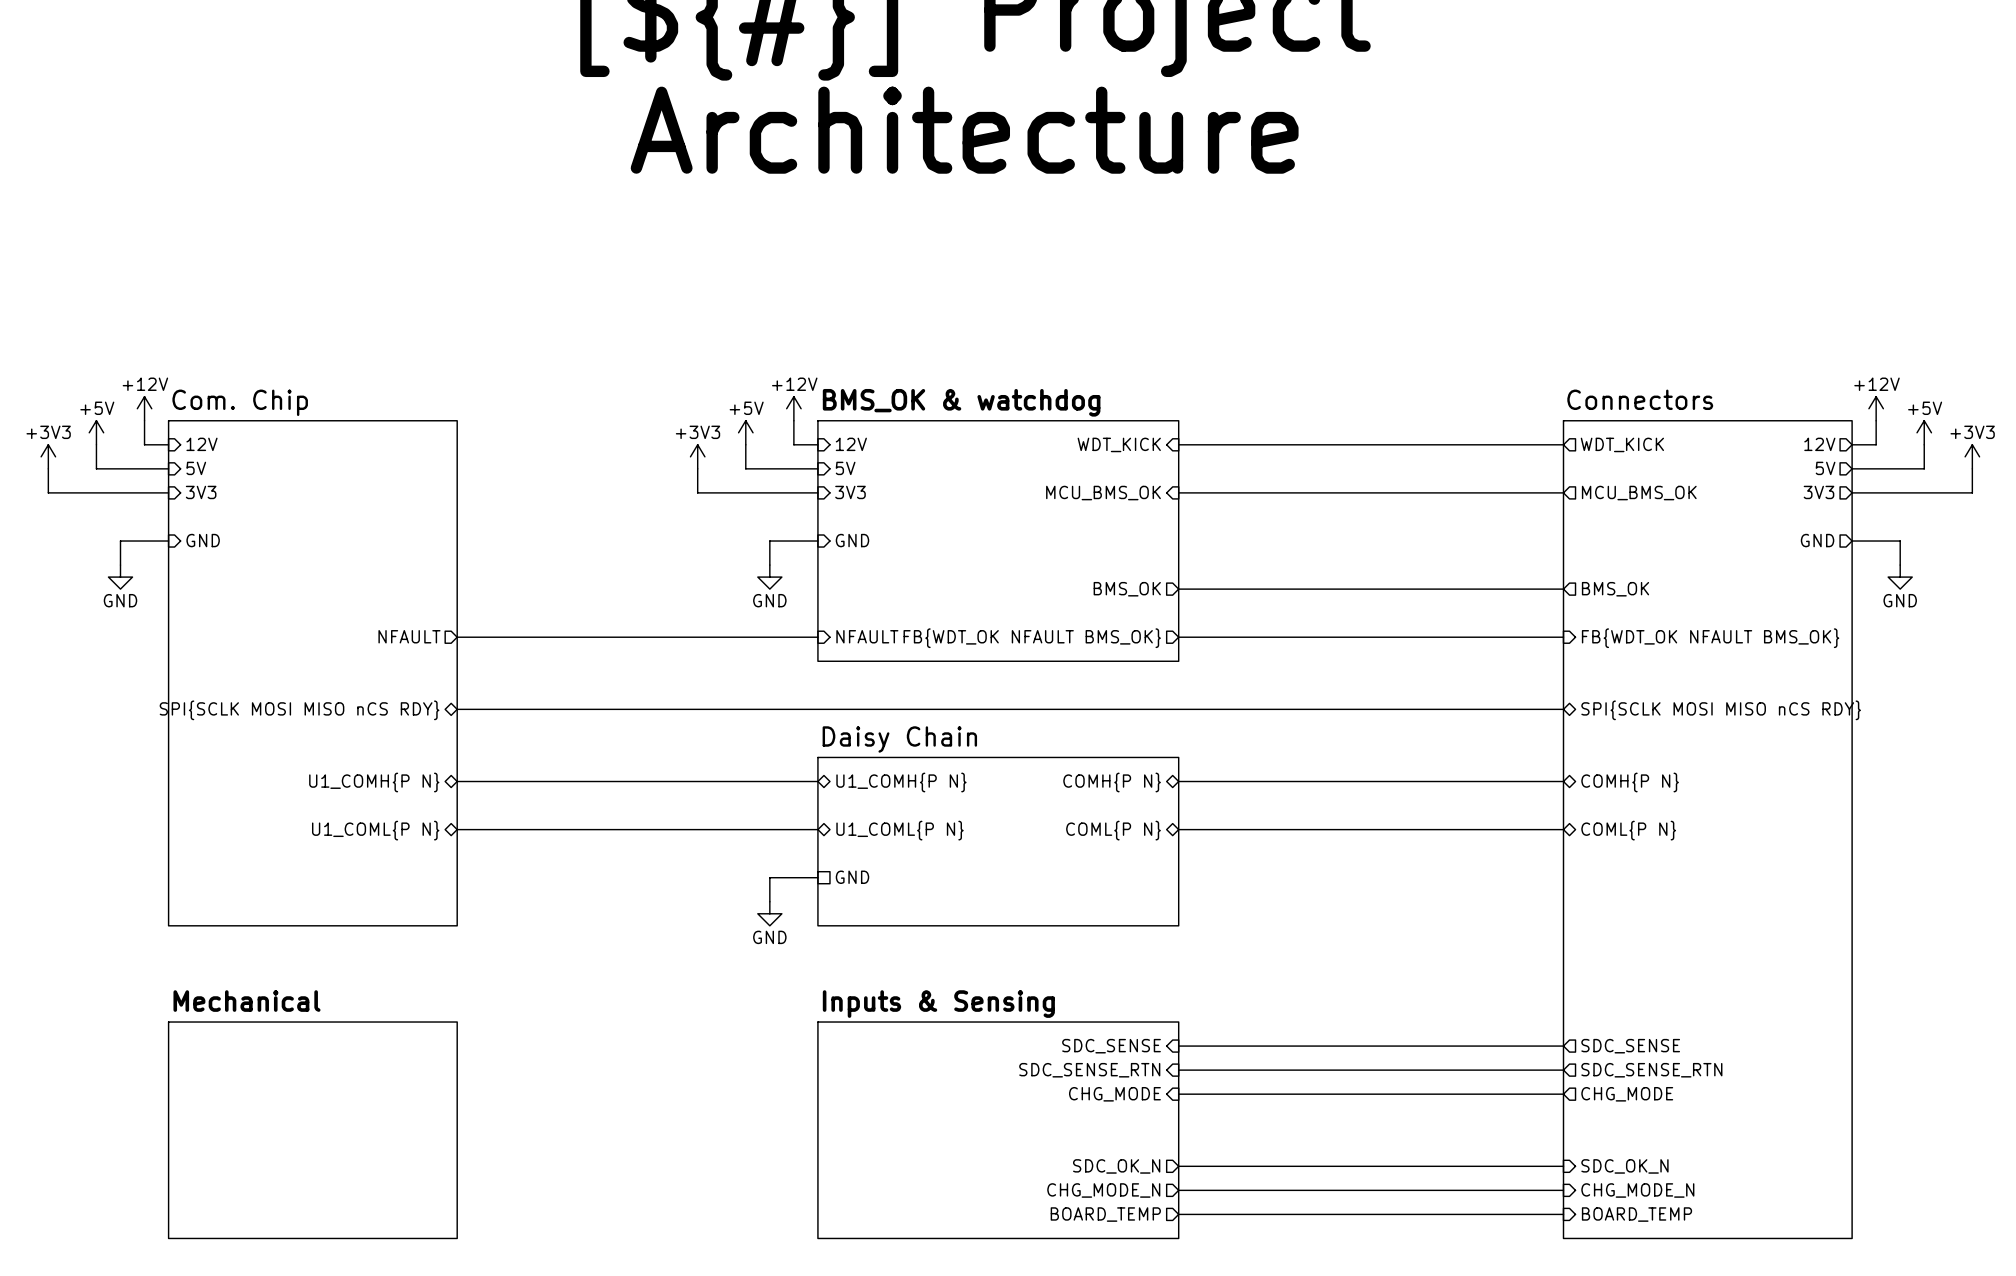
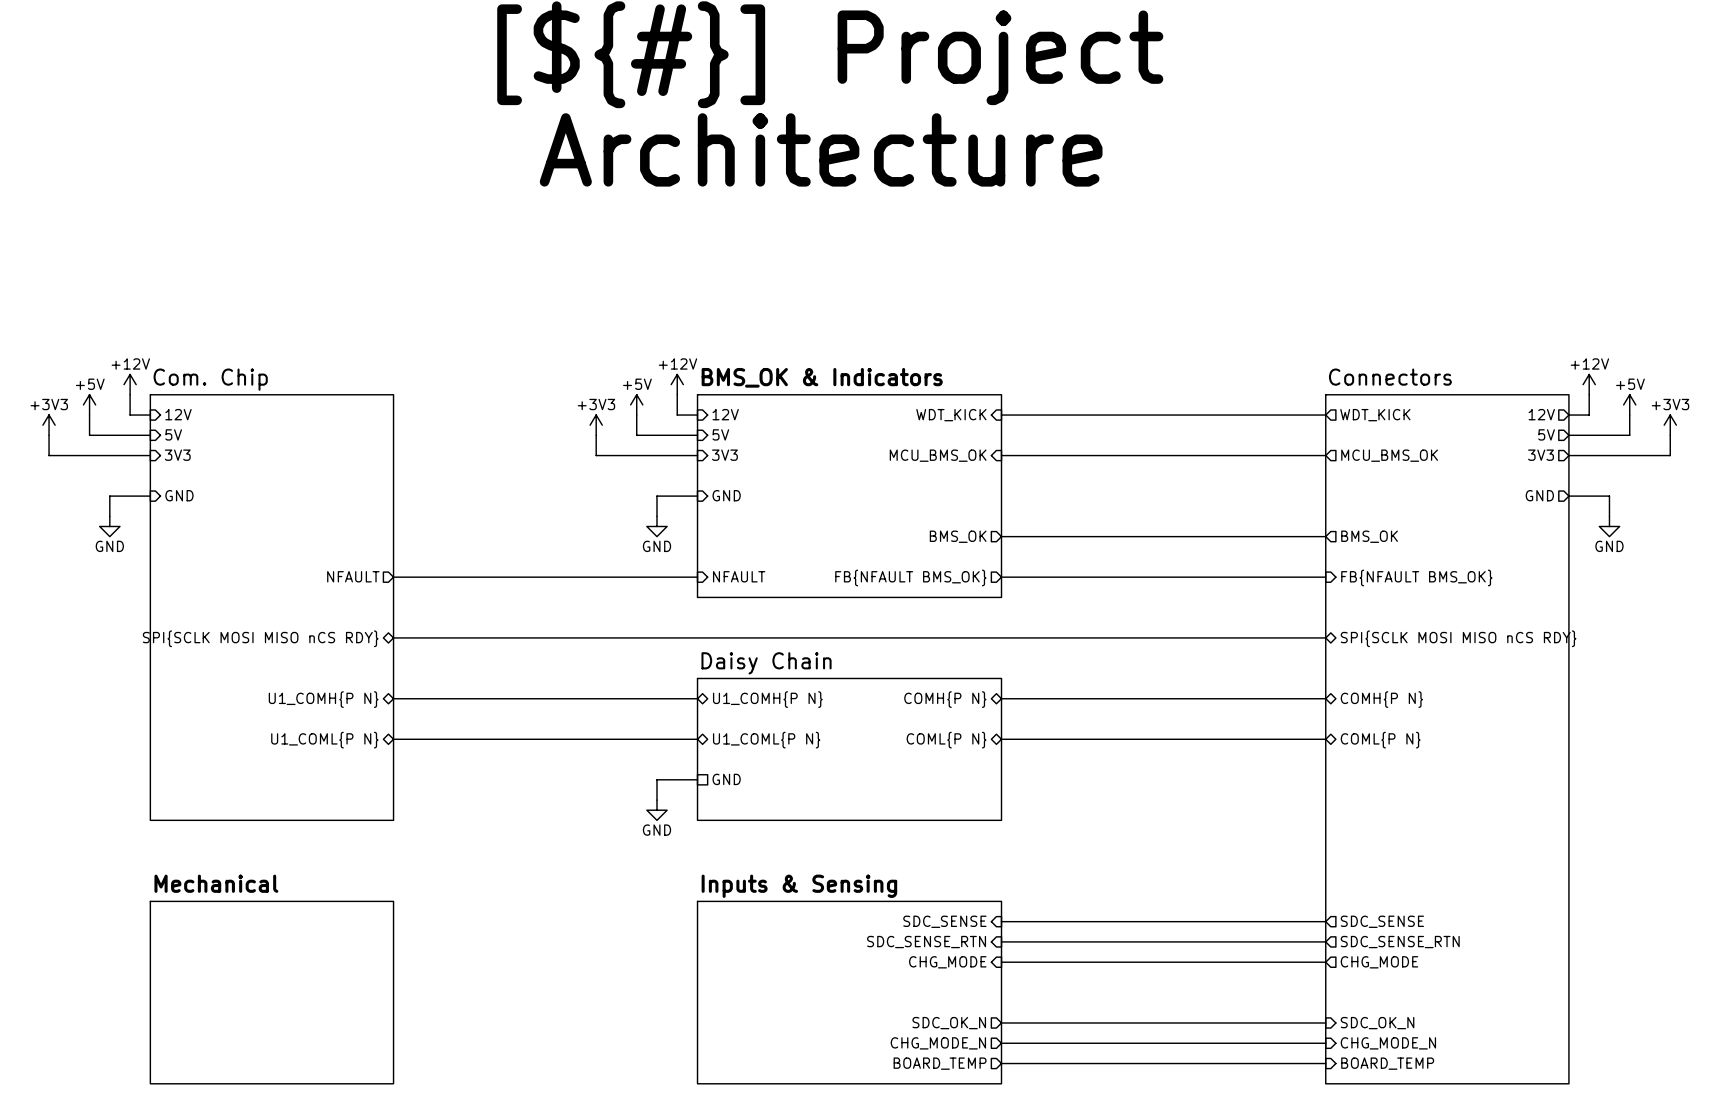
sheet BMS_OK & watchdog name: BMS_OK & watchdog (961, 402) -> BMS_OK & Indicators (822, 377)
sheet pin: FB{WDT_OK NFAULT BMS_OK} (1032, 638) -> FB{NFAULT BMS_OK} (910, 577)
sheet pin: FB{WDT_OK NFAULT BMS_OK} (1710, 638) -> FB{NFAULT BMS_OK} (1416, 577)

